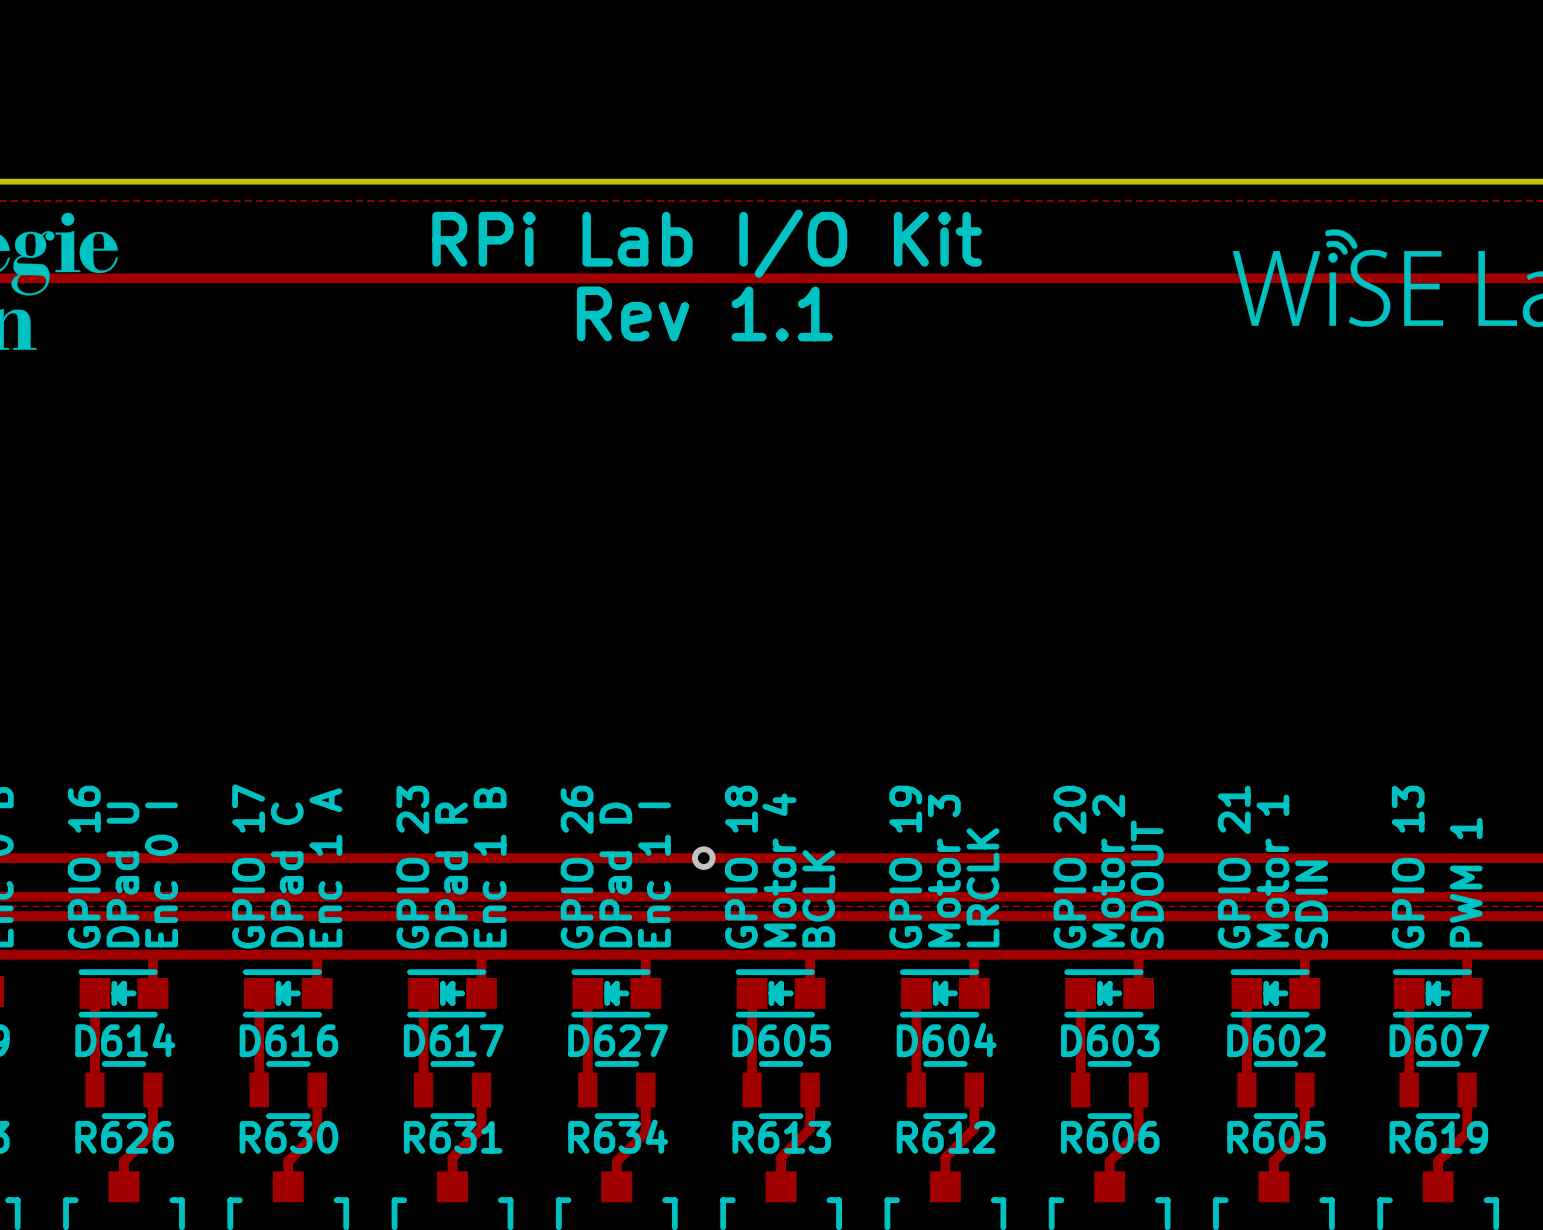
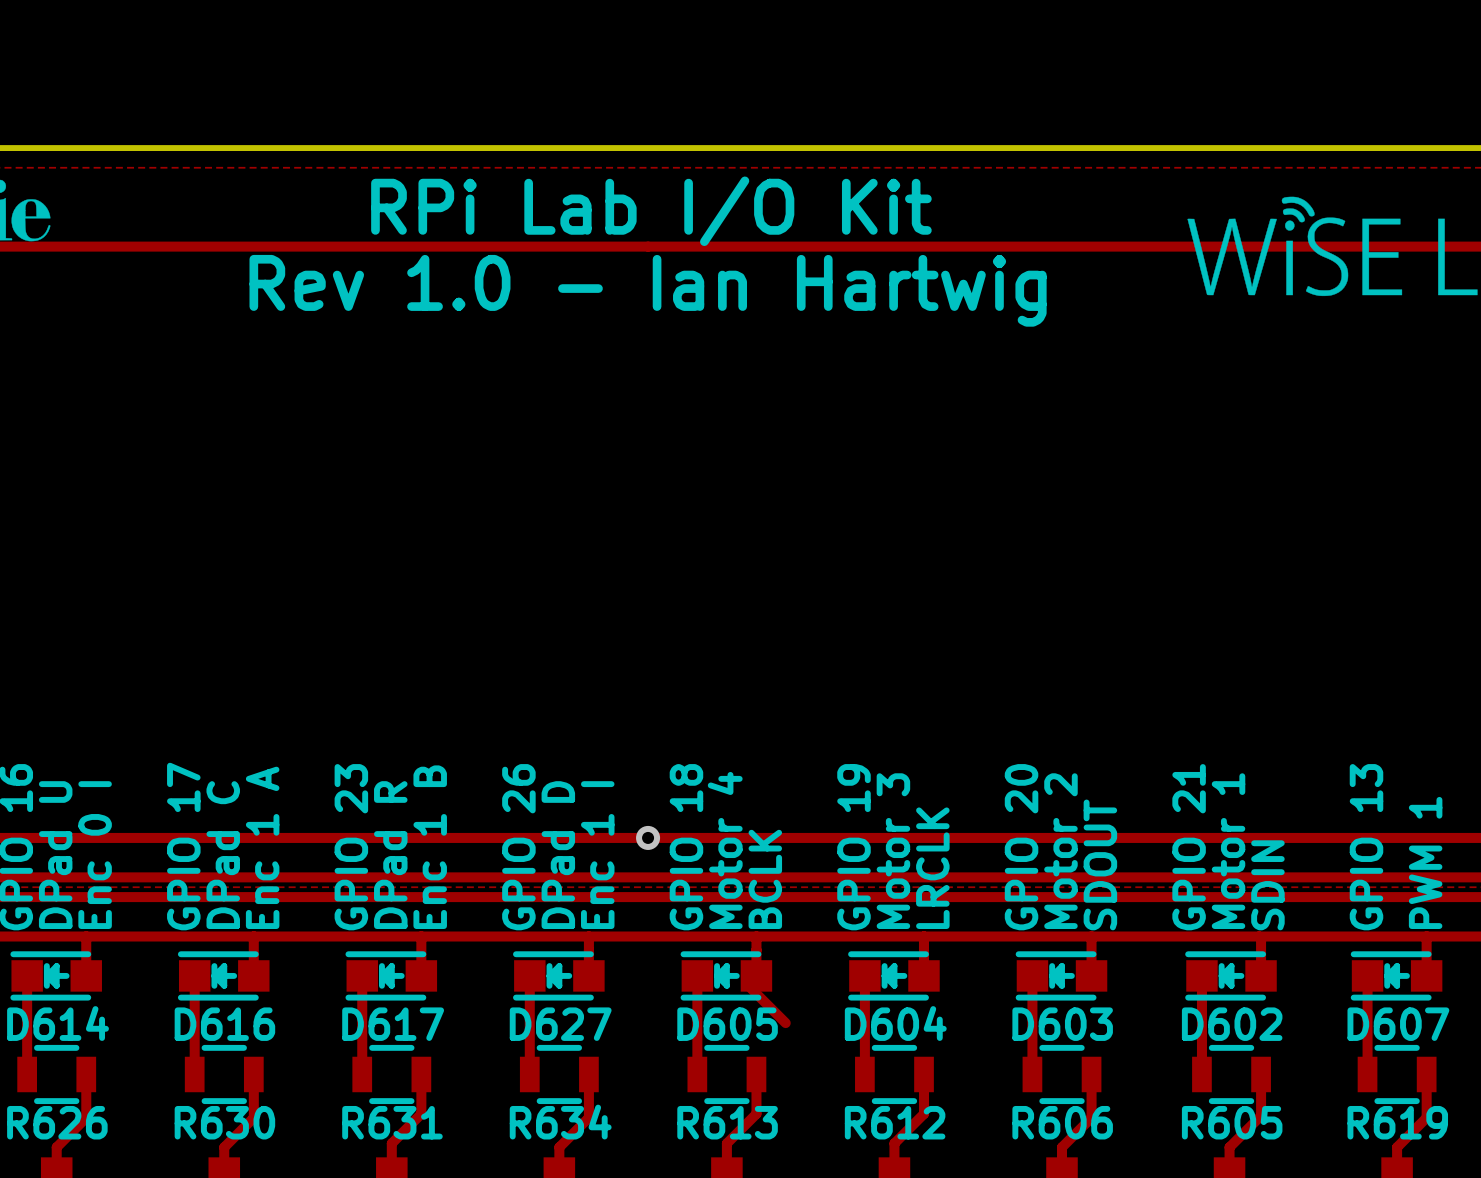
text: Rev 1.1 (704, 313) -> Rev 1.0 - Ian Hartwig (648, 290)
track: none -> (746, 983) (785, 1023)

